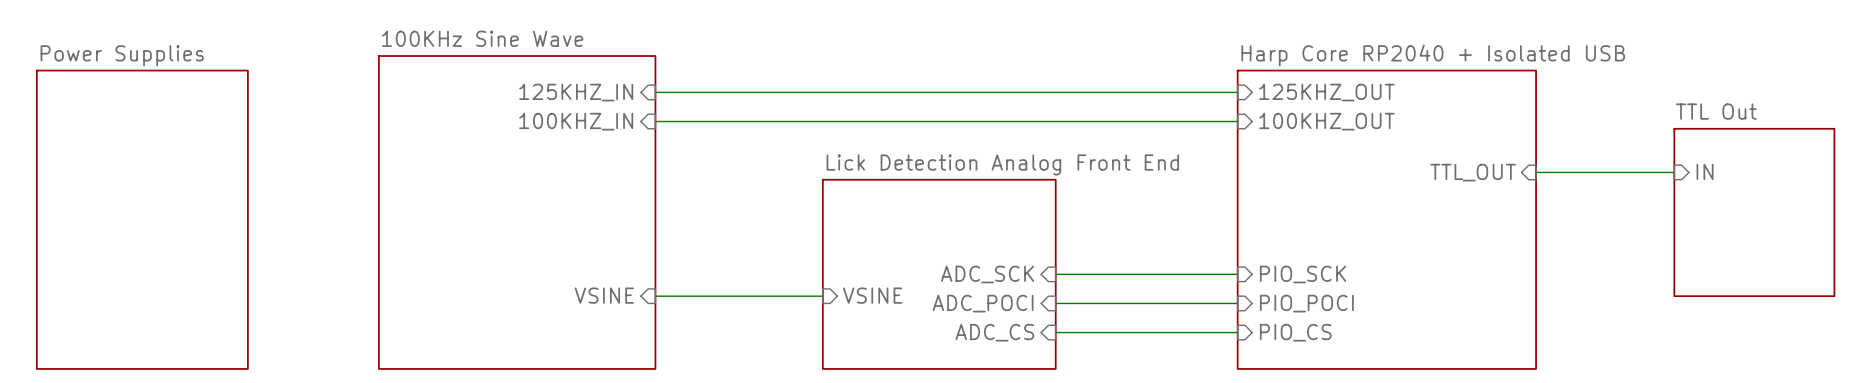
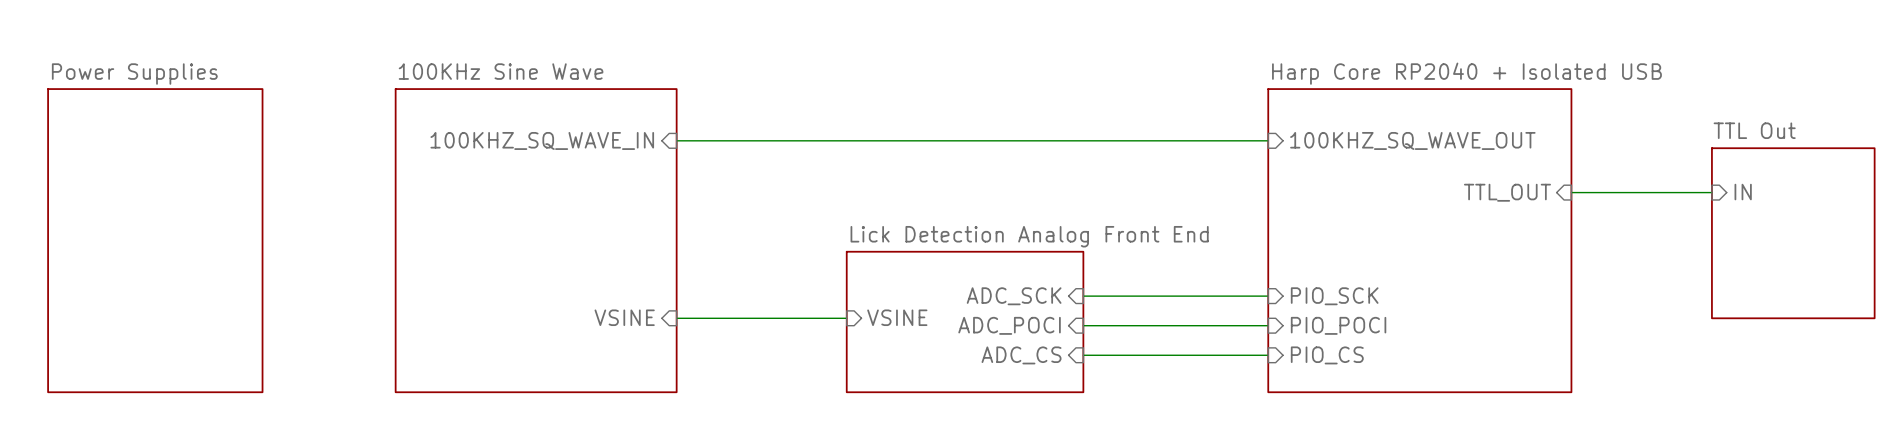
sheet 100KHz Sine Wave shape: [378, 55, 657, 370] -> [394, 88, 678, 394]
sheet pin: 125KHZ_IN (576, 92) -> none
wire: (655, 92) (1237, 92) -> none
sheet pin: 125KHZ_OUT (1326, 92) -> none
sheet pin: 100KHZ_IN (576, 121) -> 100KHZ_SQ_WAVE_IN (542, 140)
sheet pin: 100KHZ_OUT (1326, 121) -> 100KHZ_SQ_WAVE_OUT (1412, 140)
sheet Lick Detection Analog Front End: (939, 274) -> none
sheet Lick Detection Analog Front End: none -> (965, 322)

